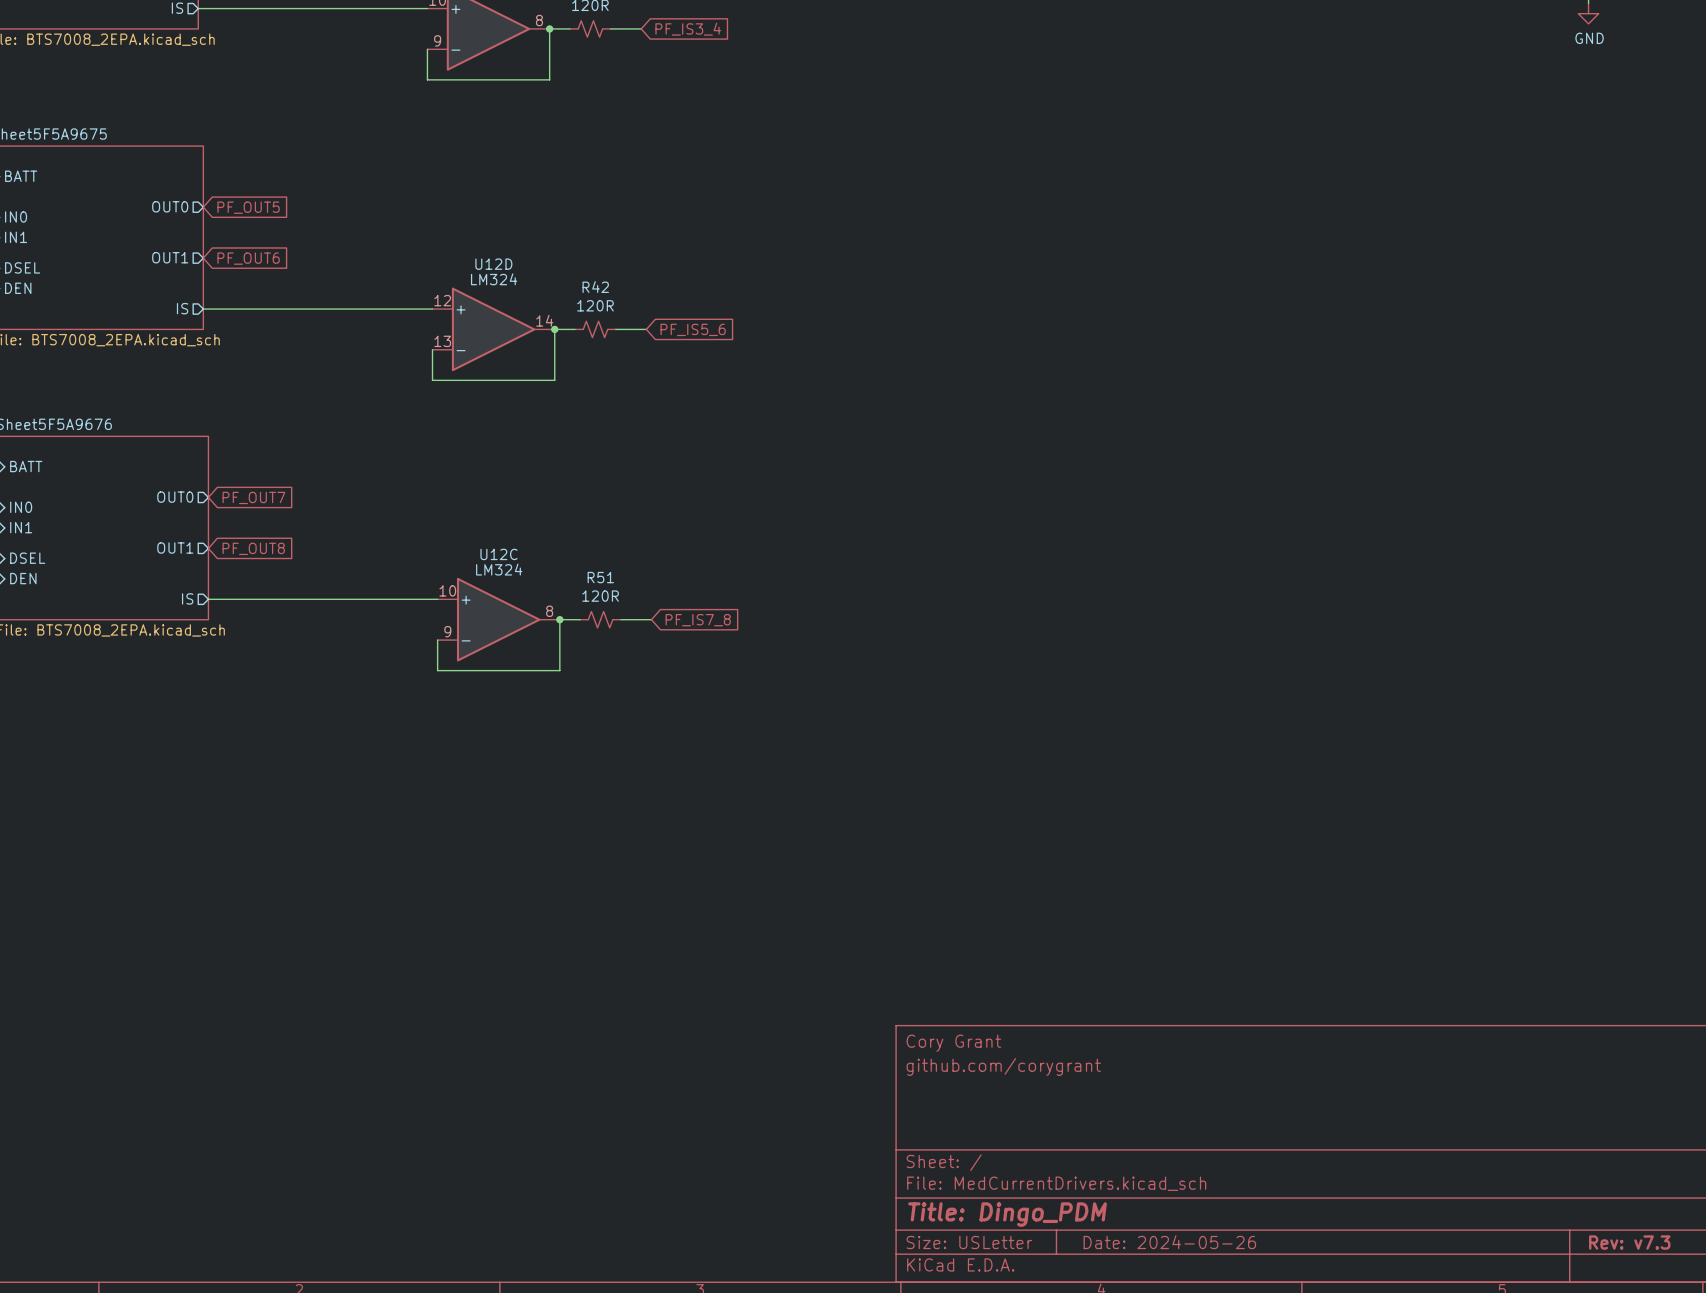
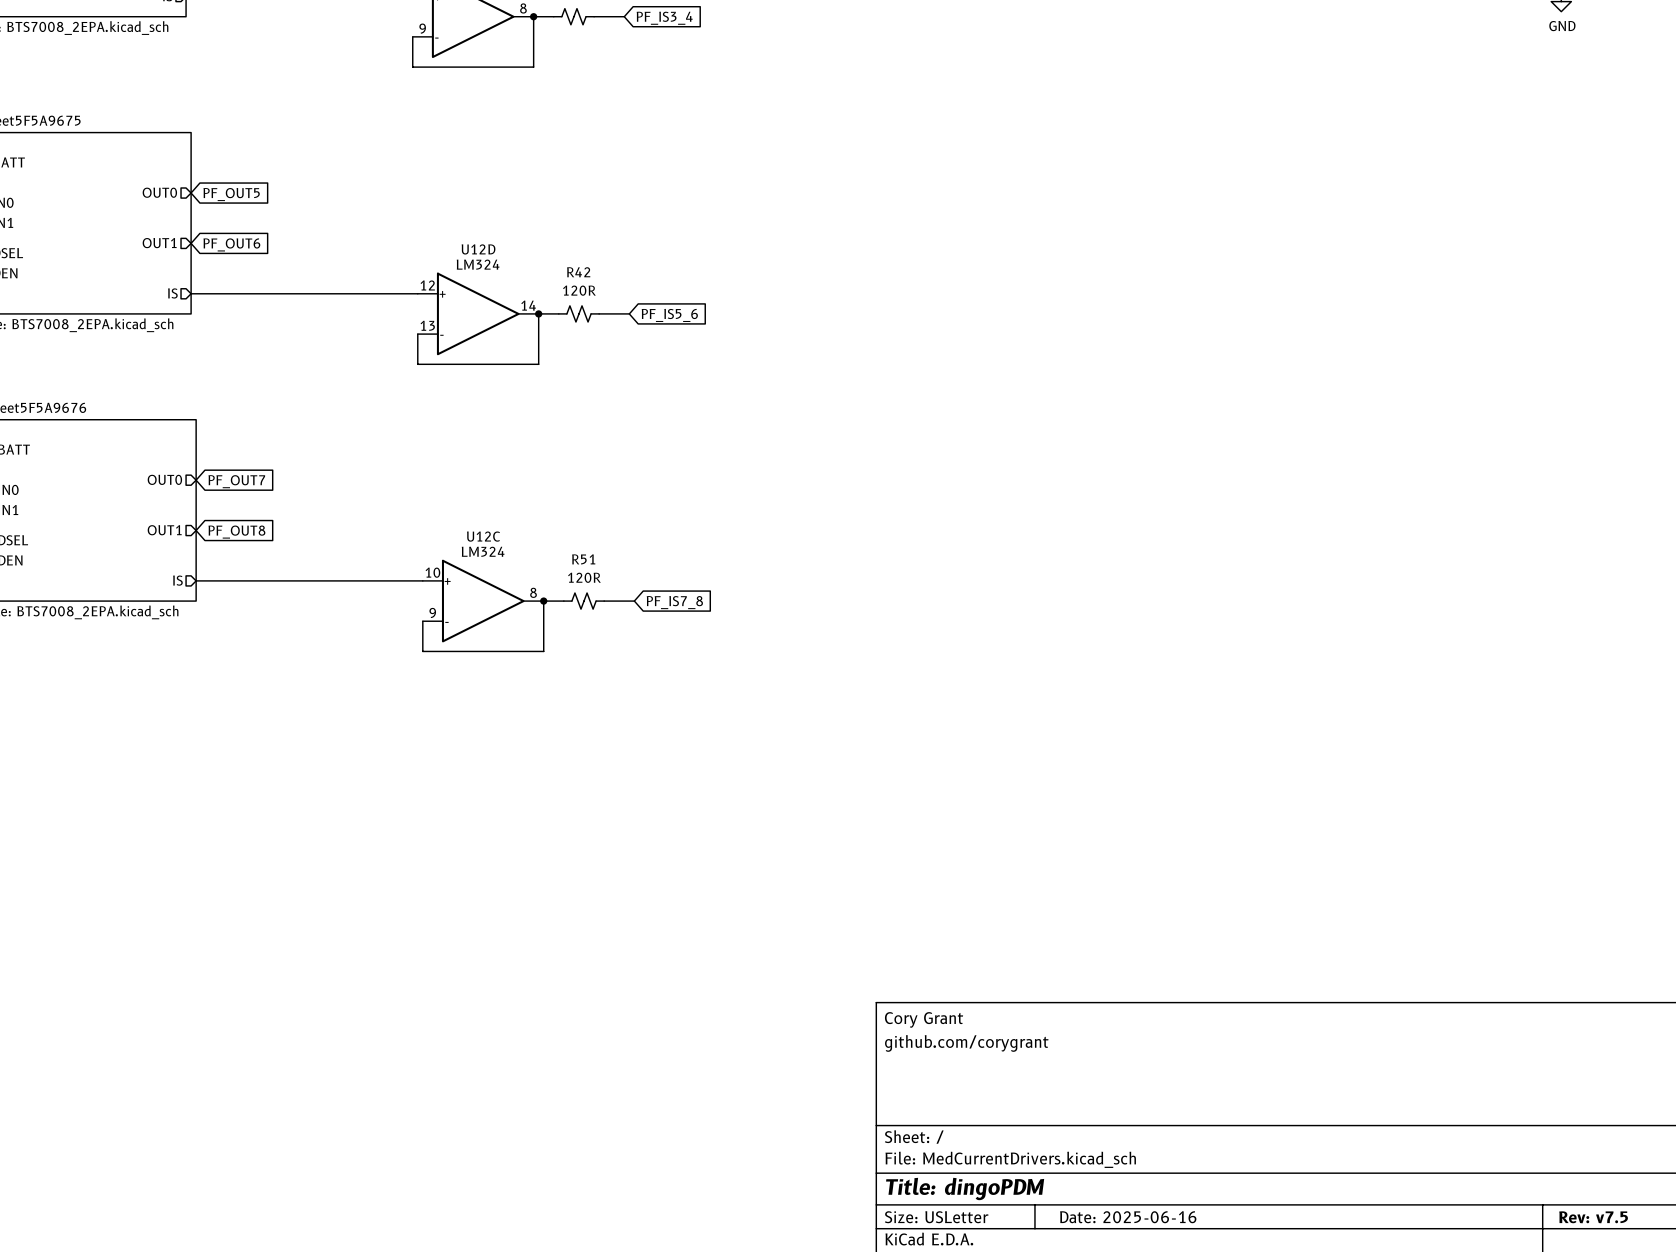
title block: Title: Dingo_PDM (1007, 1214) -> Title: dingoPDM (965, 1188)
title block: Date: 2024-05-26 (1169, 1242) -> Date: 2025-06-16 (1128, 1217)
title block: Rev: v7.3 (1629, 1242) -> Rev: v7.5 (1593, 1217)

